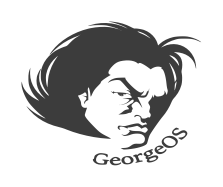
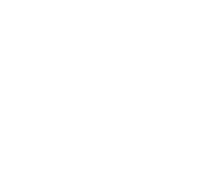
drawing: [21, 21, 202, 166] -> none

